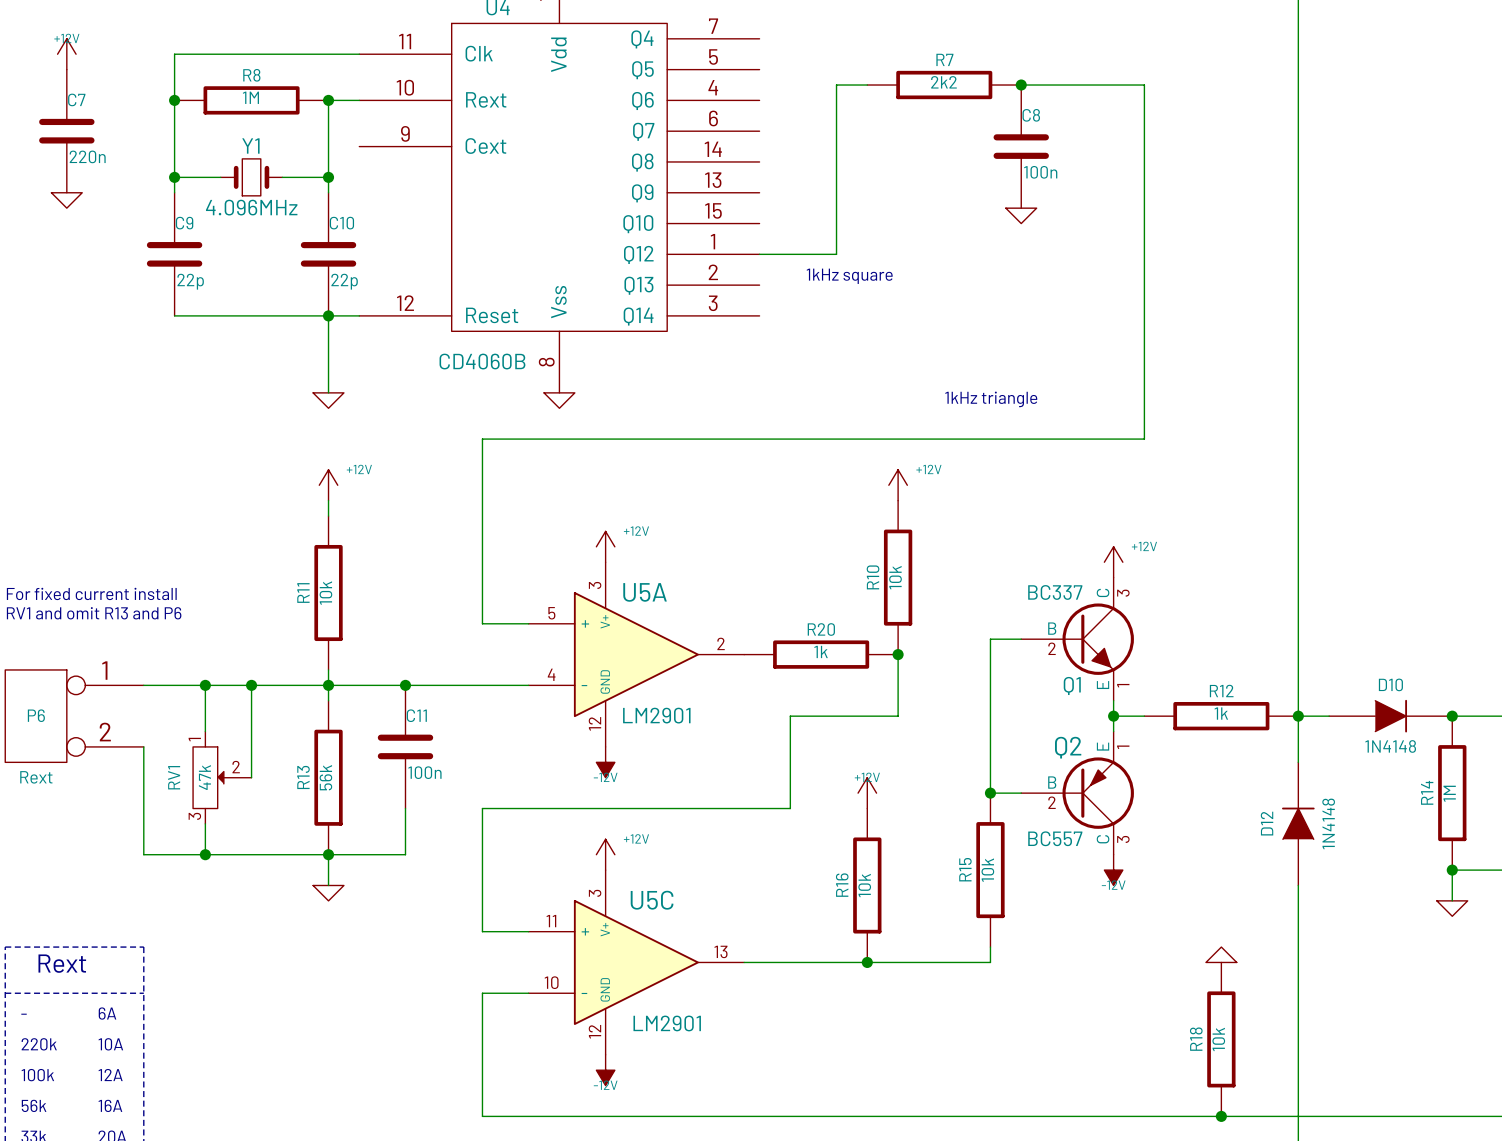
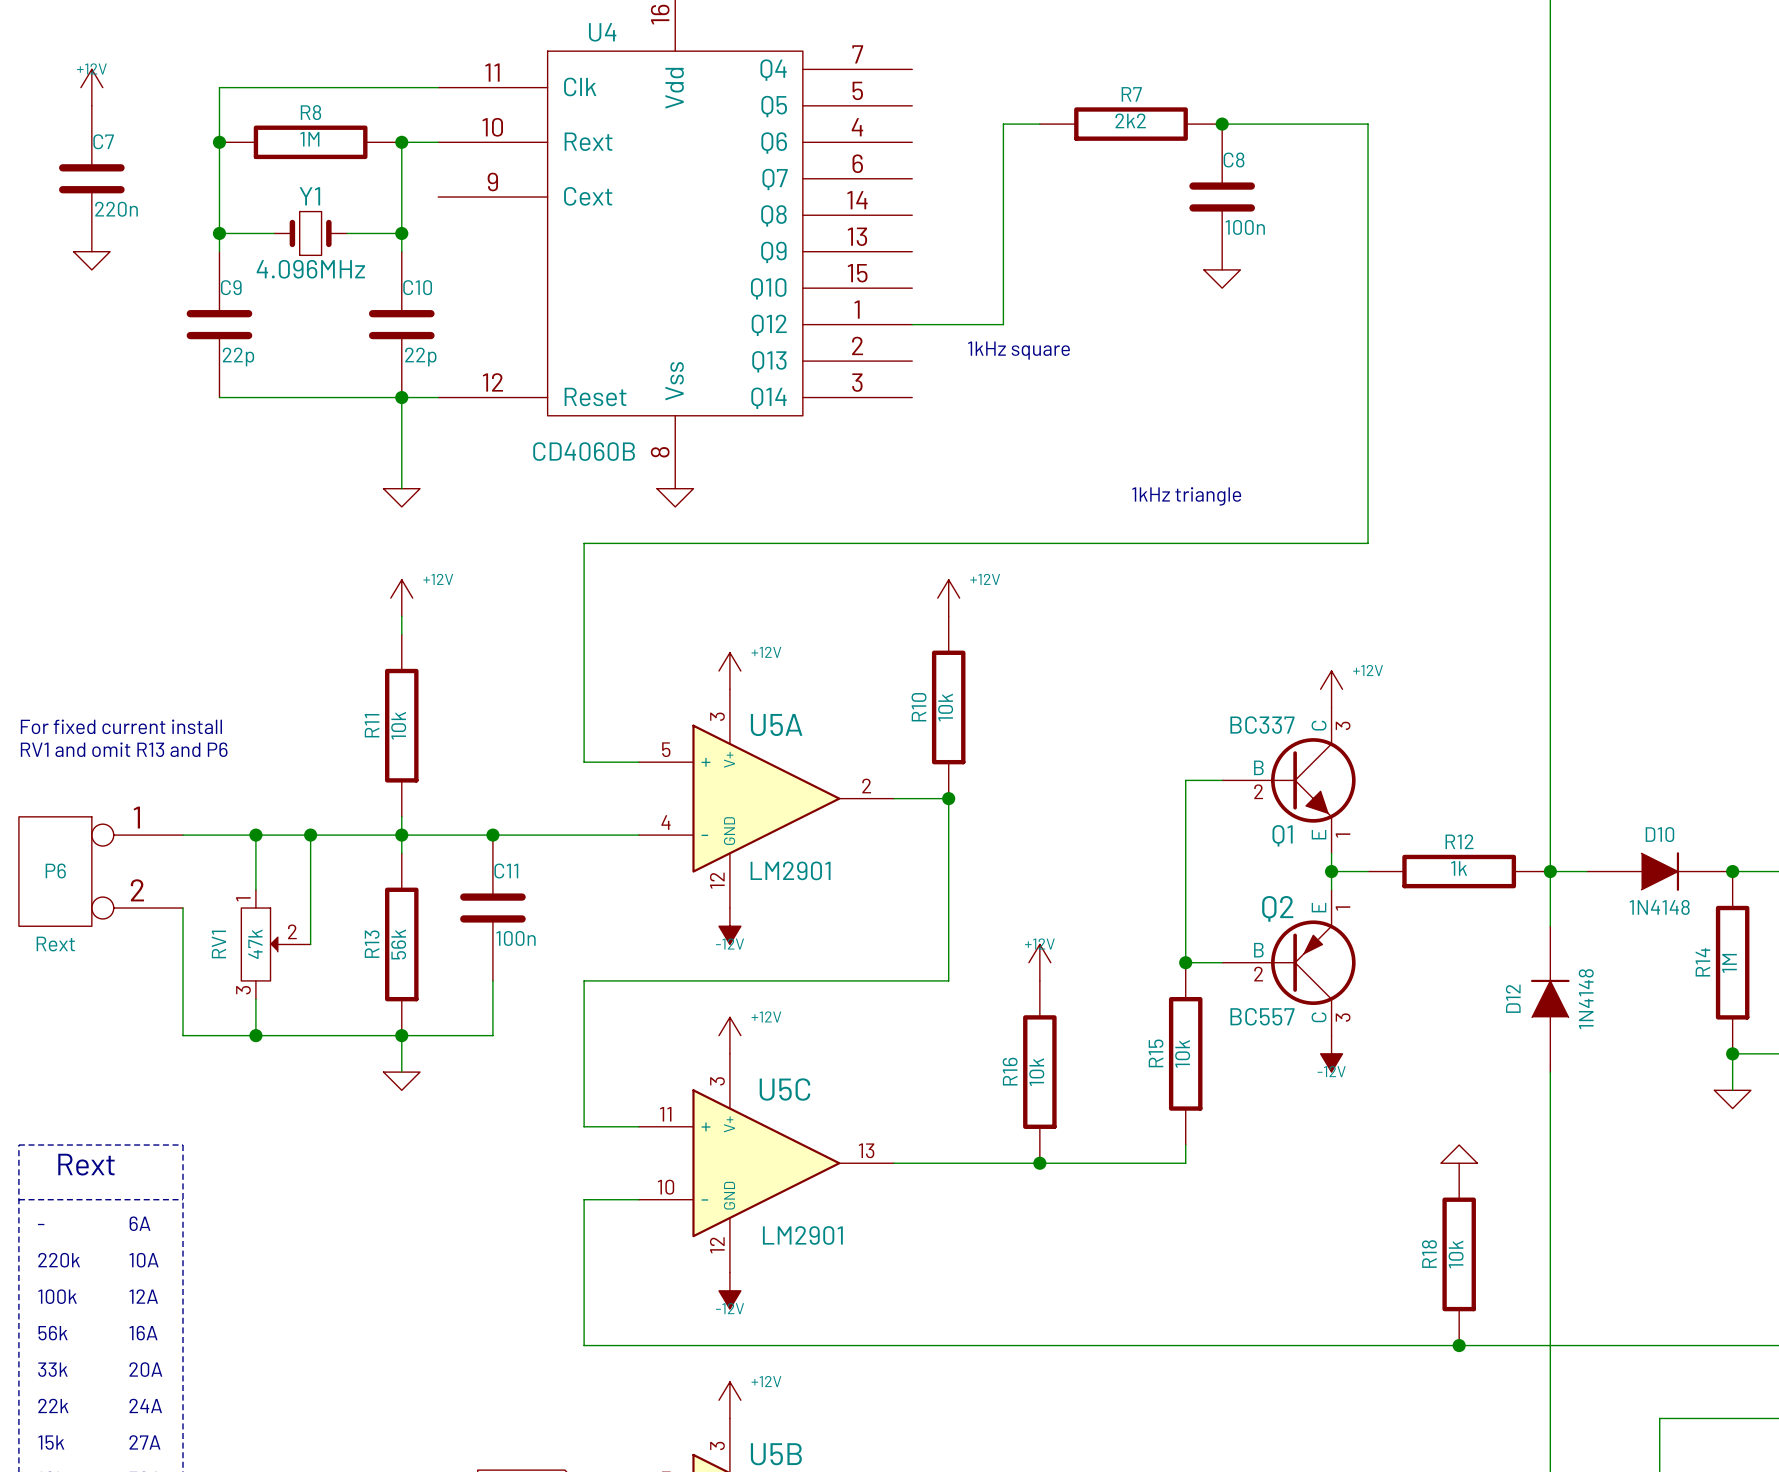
power symbol position: +12V (898, 485) -> +12V (948, 598)
R10 position: (898, 577) -> (948, 707)
junction: none -> (948, 798)
R20: 1k (821, 654) -> none
wire: (898, 654) (898, 716) (790, 716) -> (894, 798) (948, 798) (948, 871)
junction: (898, 654) -> none

